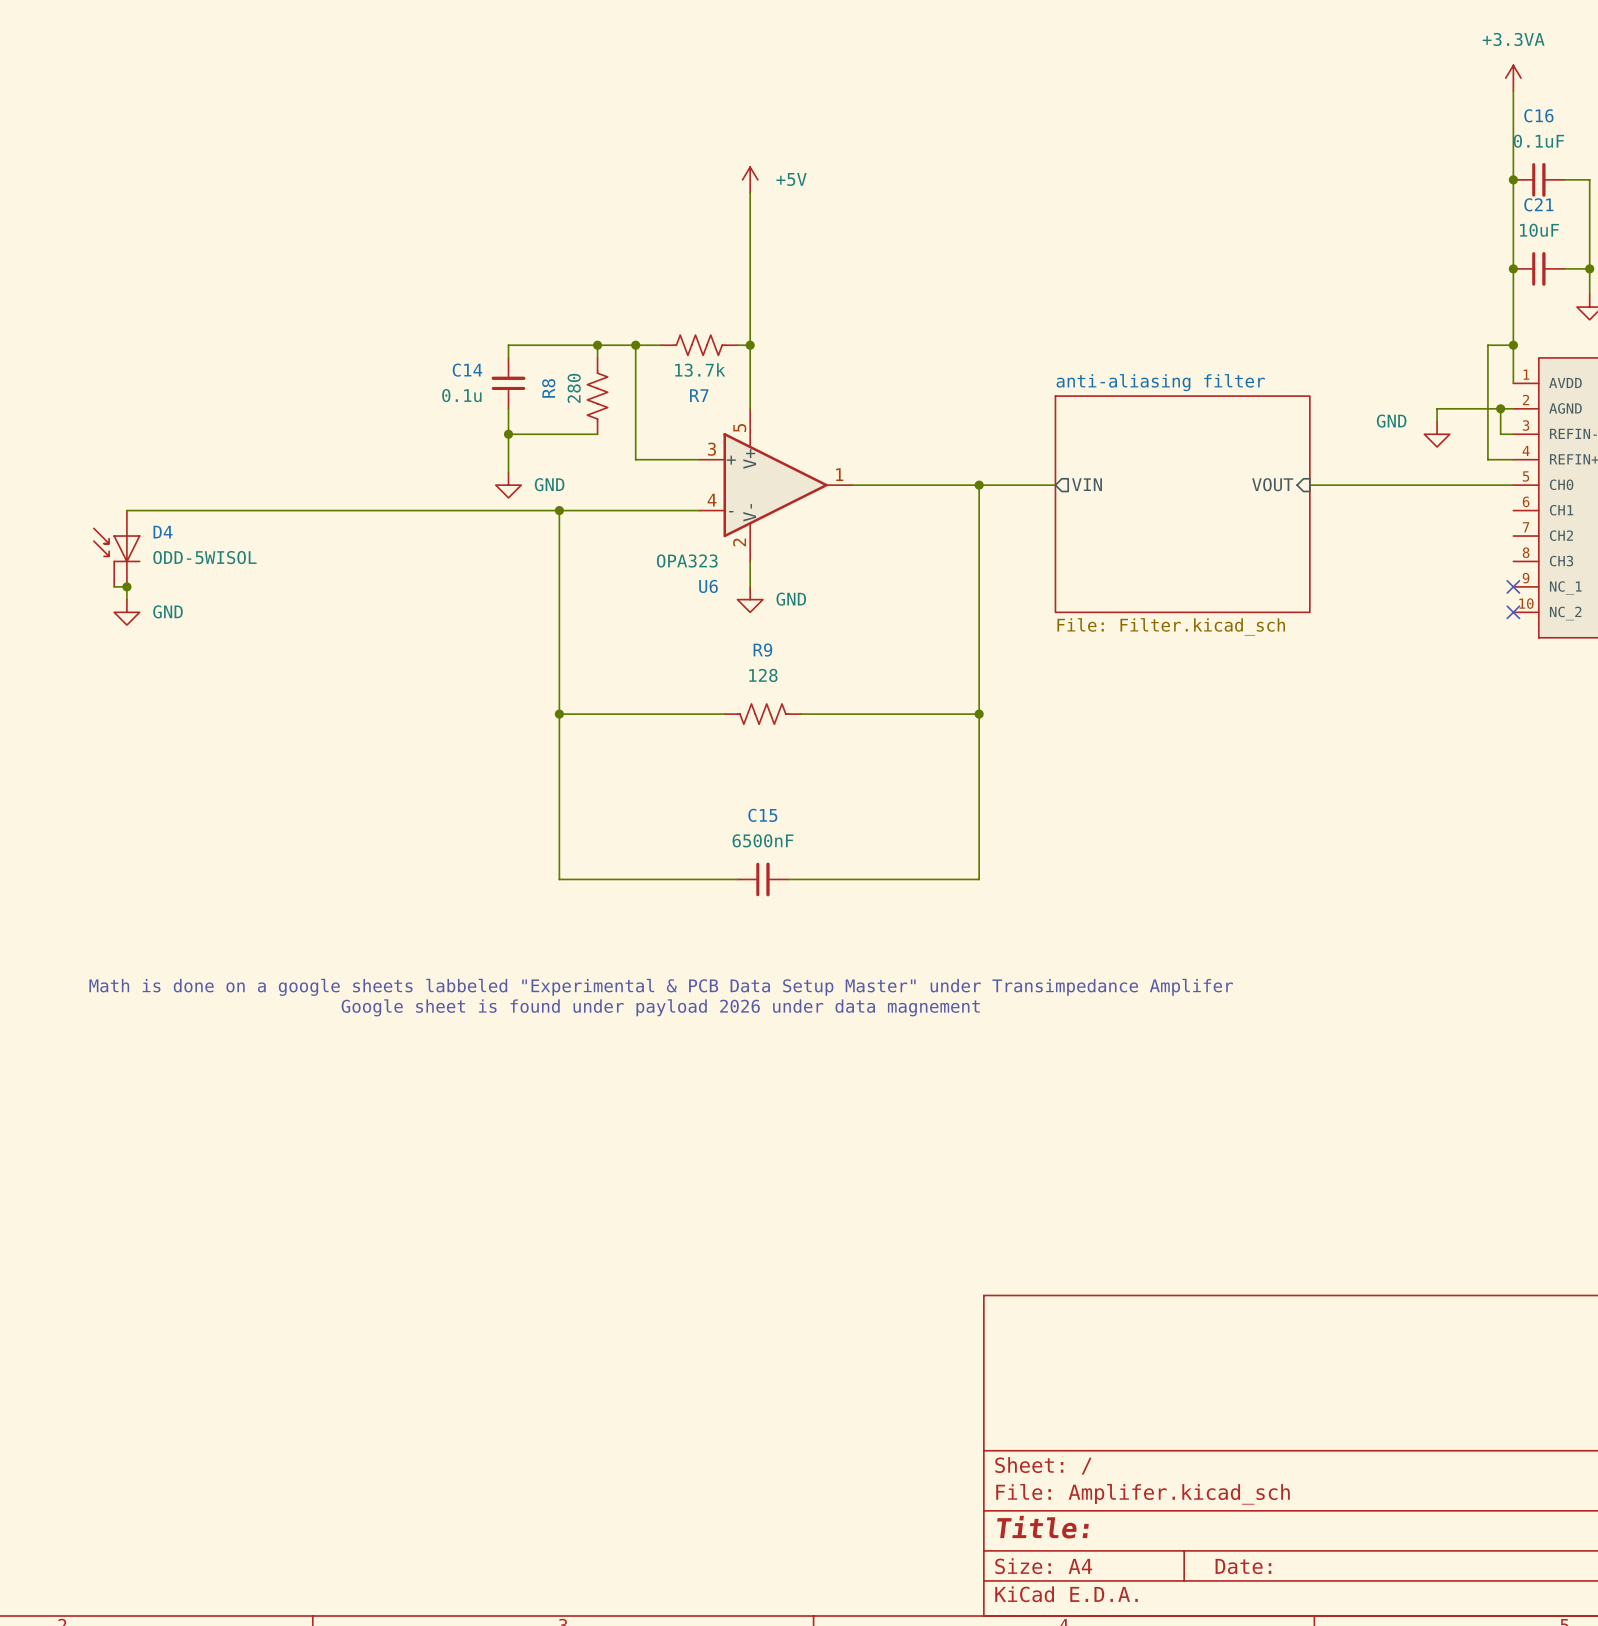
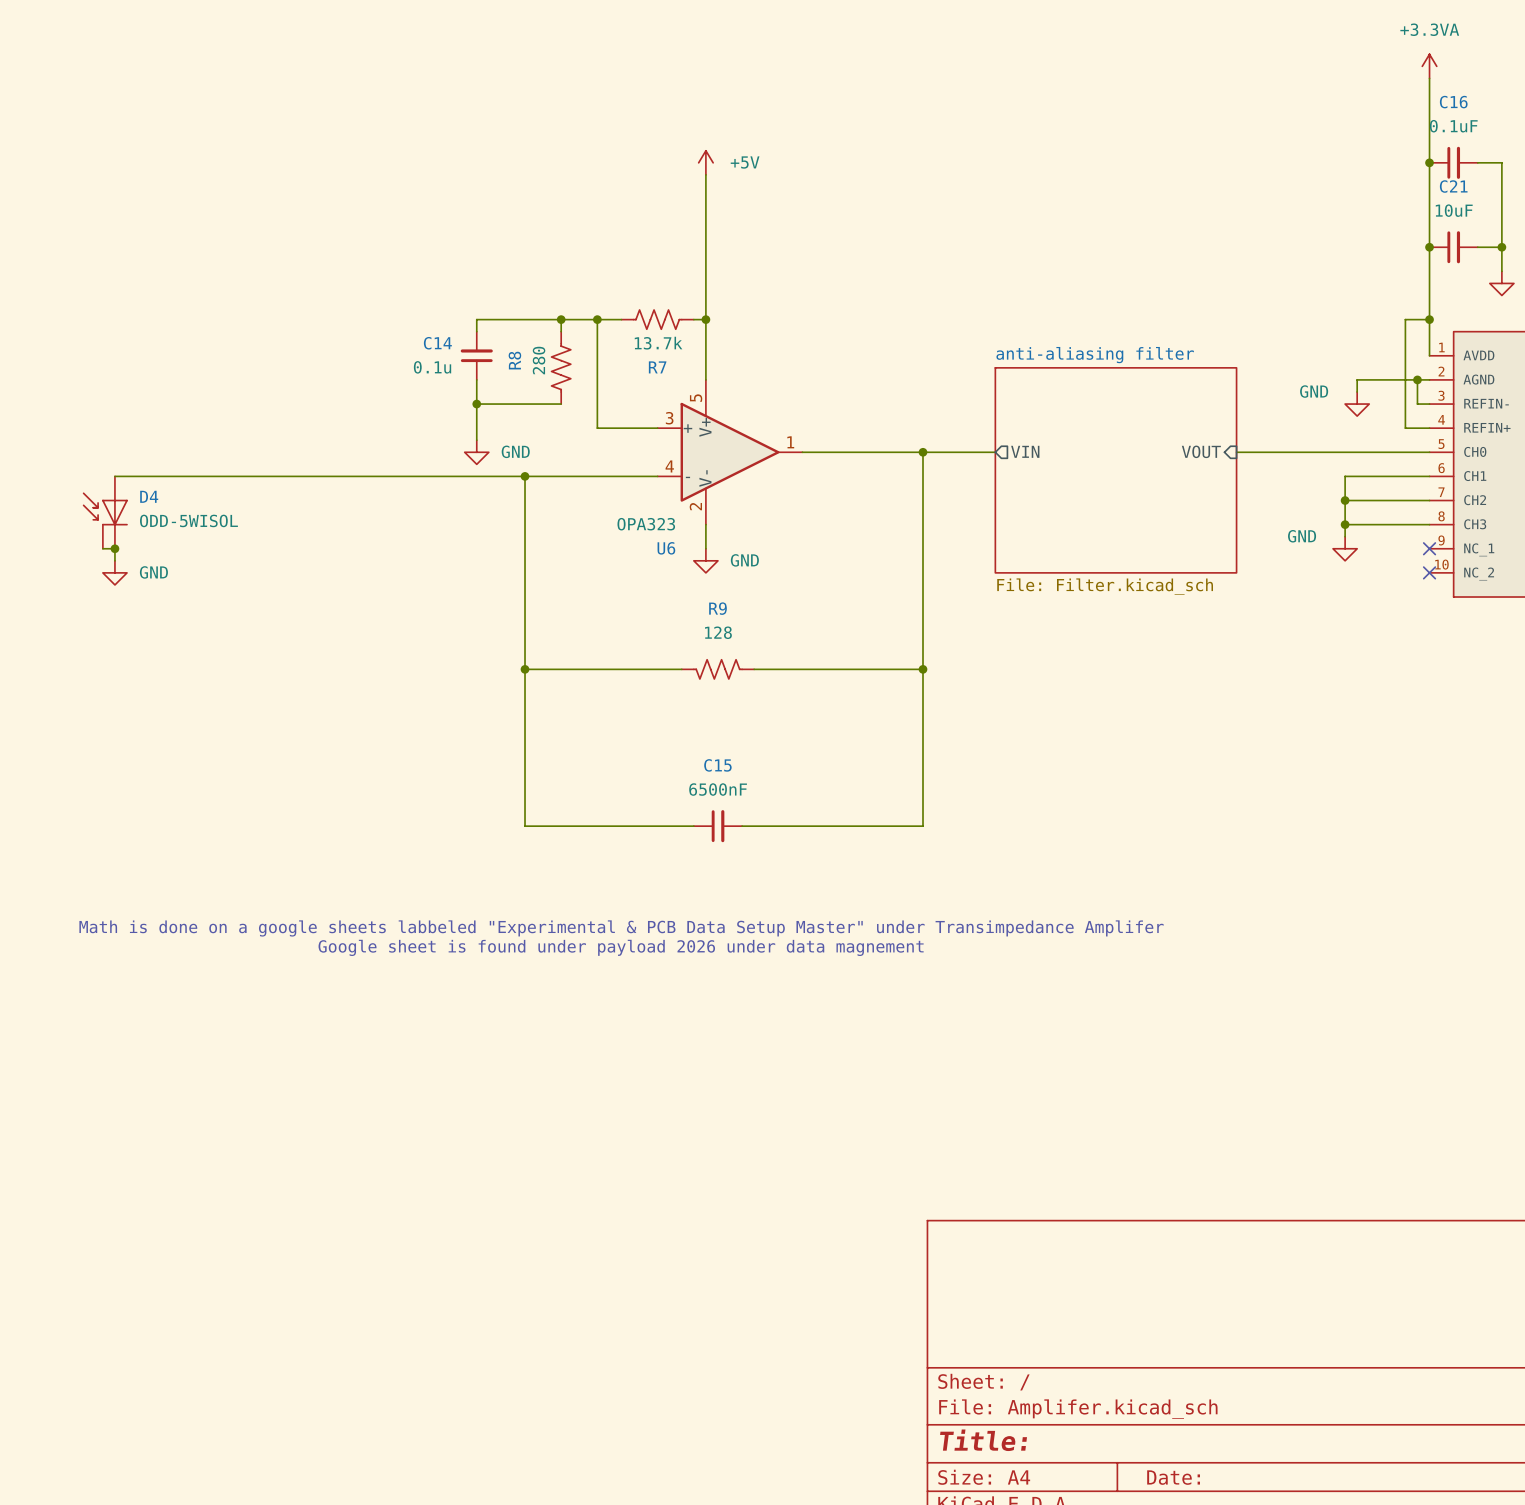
wire: none -> (1429, 476) (1345, 476) (1345, 536)
wire: none -> (1345, 500) (1429, 500)
junction: none -> (1345, 500)
wire: none -> (1345, 524) (1429, 524)
junction: none -> (1345, 524)
power symbol: none -> GND (1345, 548)

